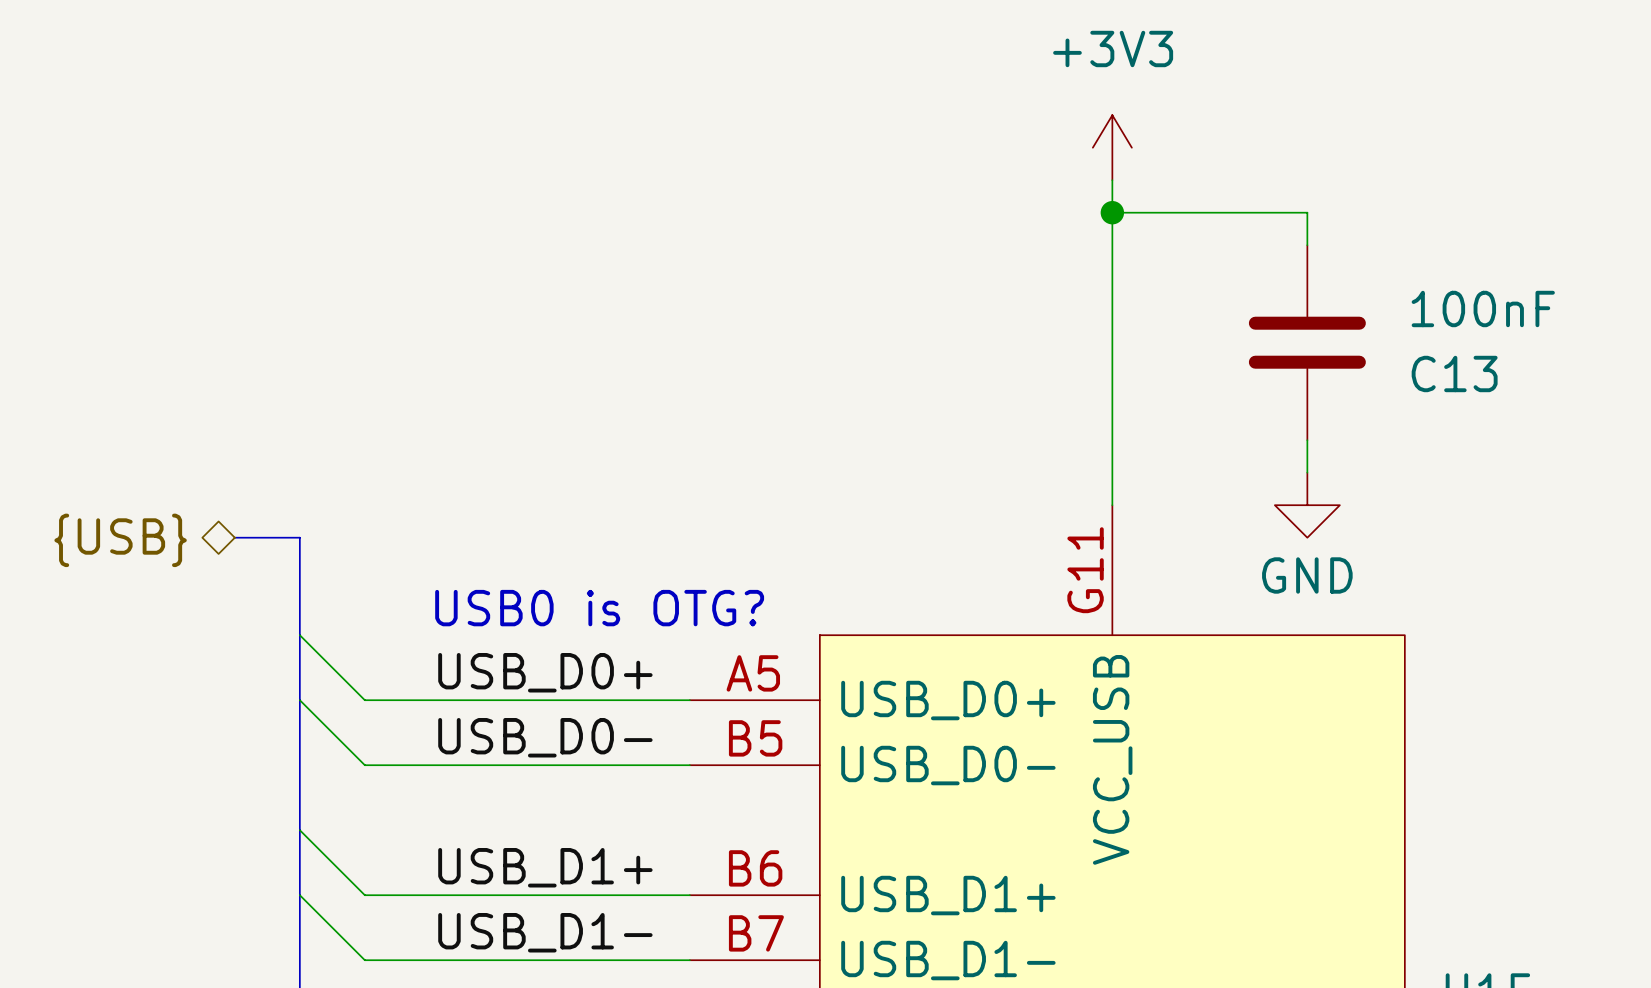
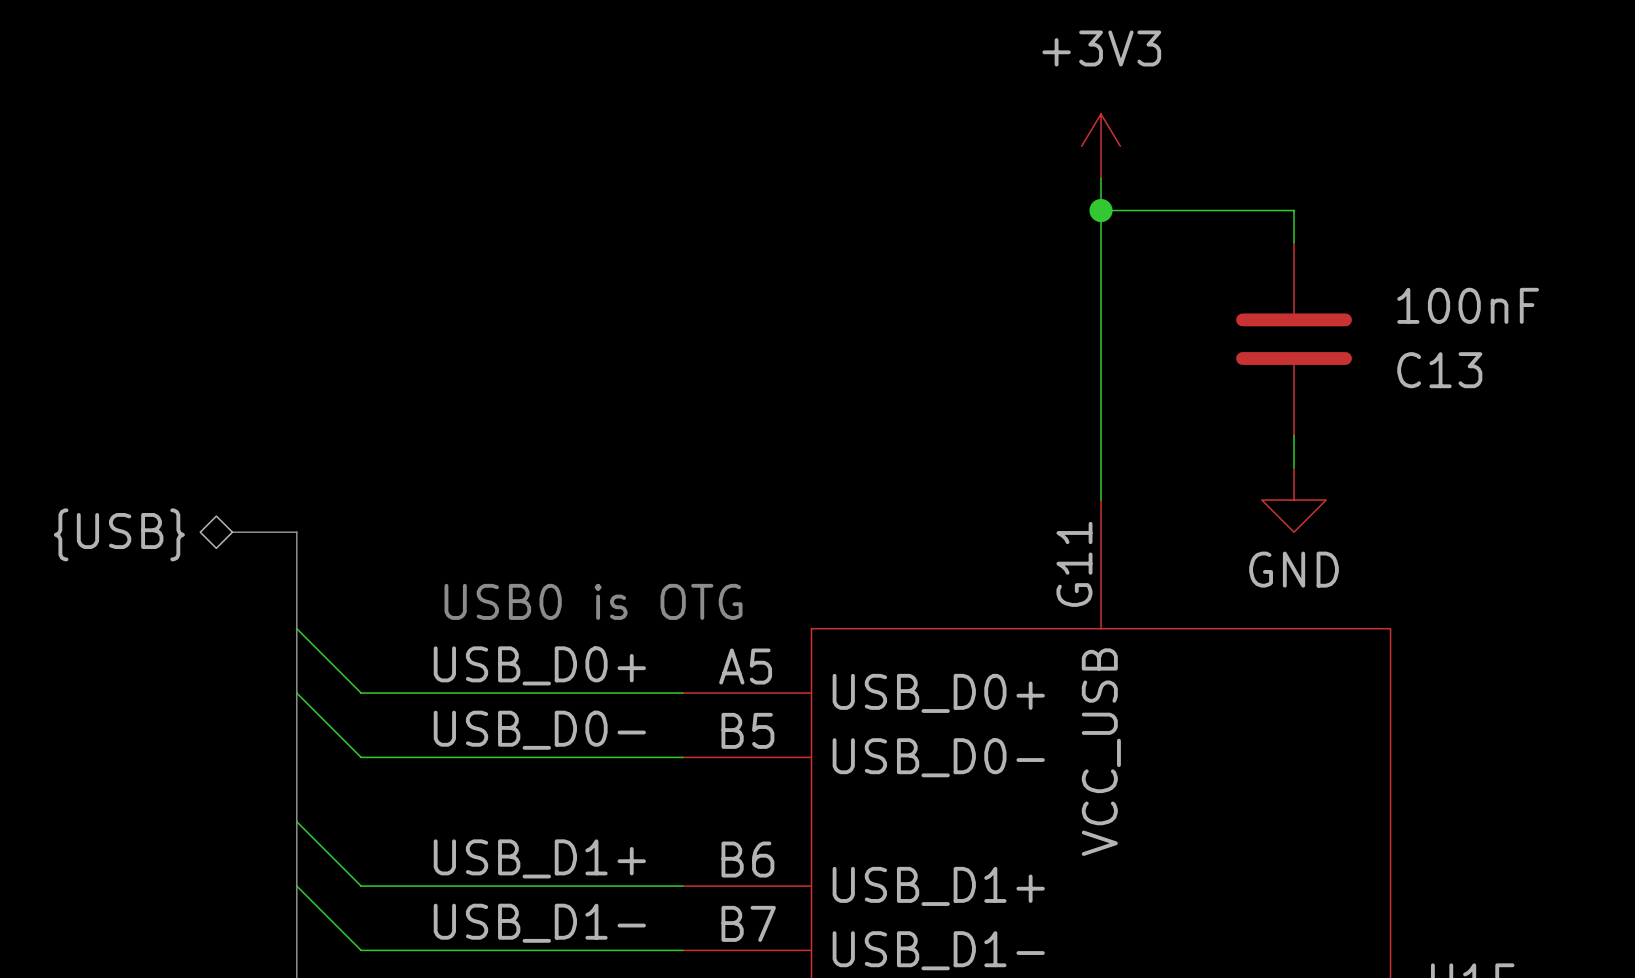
text: USB0 is OTG? (599, 608) -> USB0 is OTG (593, 601)

